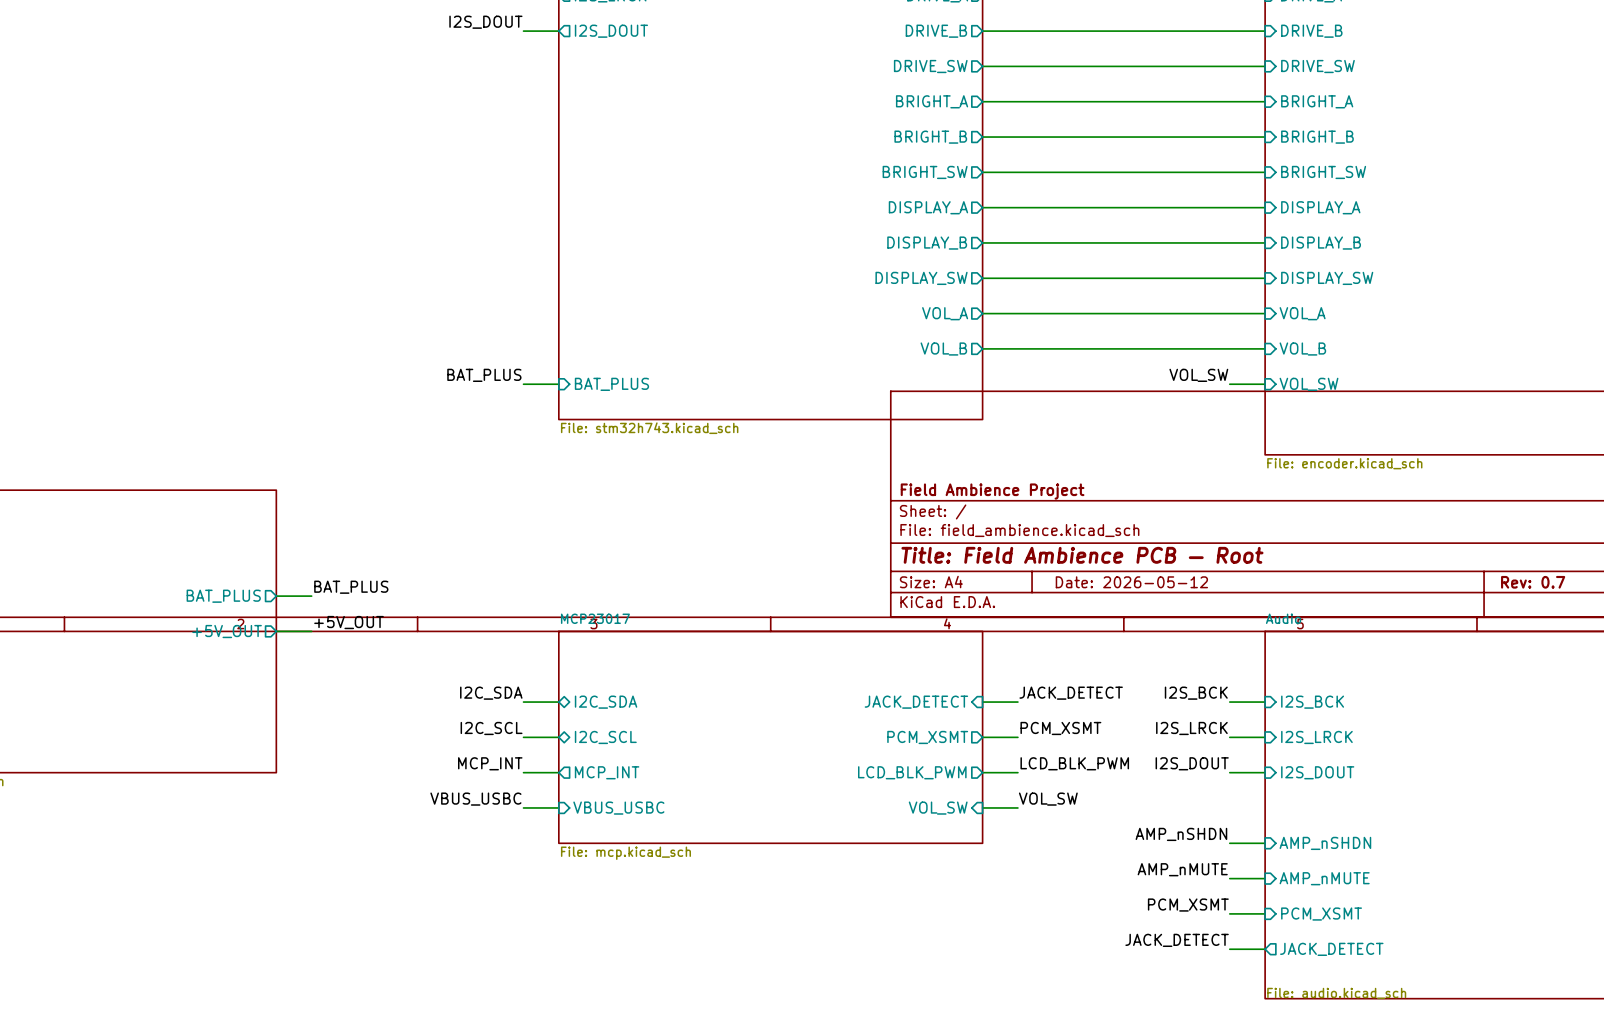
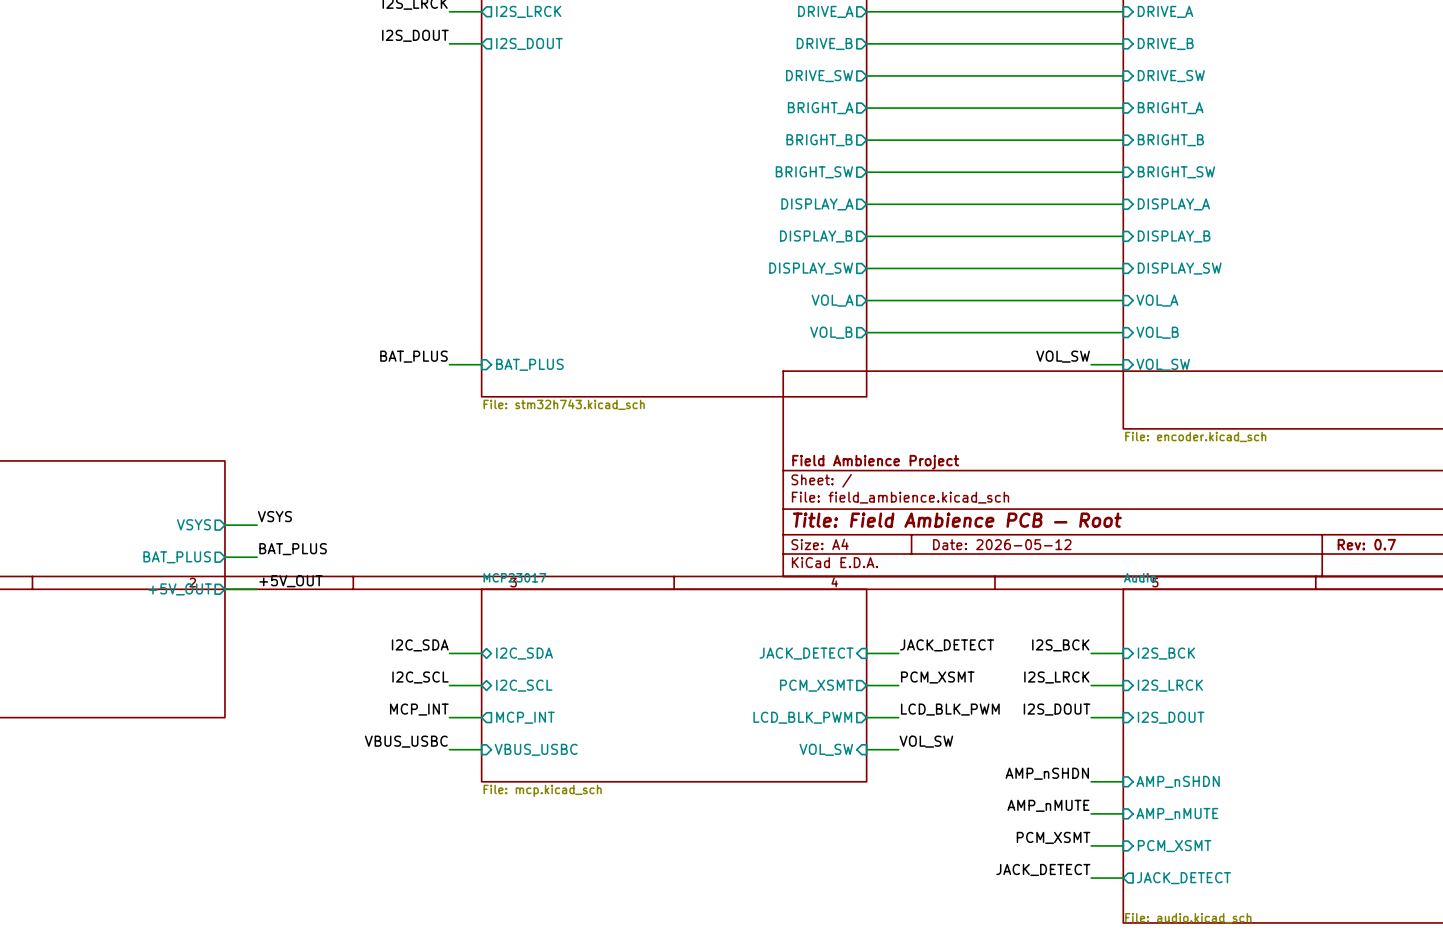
label: none -> VSYS (274, 516)
sheet pin: none -> VSYS (193, 524)
wire: none -> (224, 525) (257, 525)

